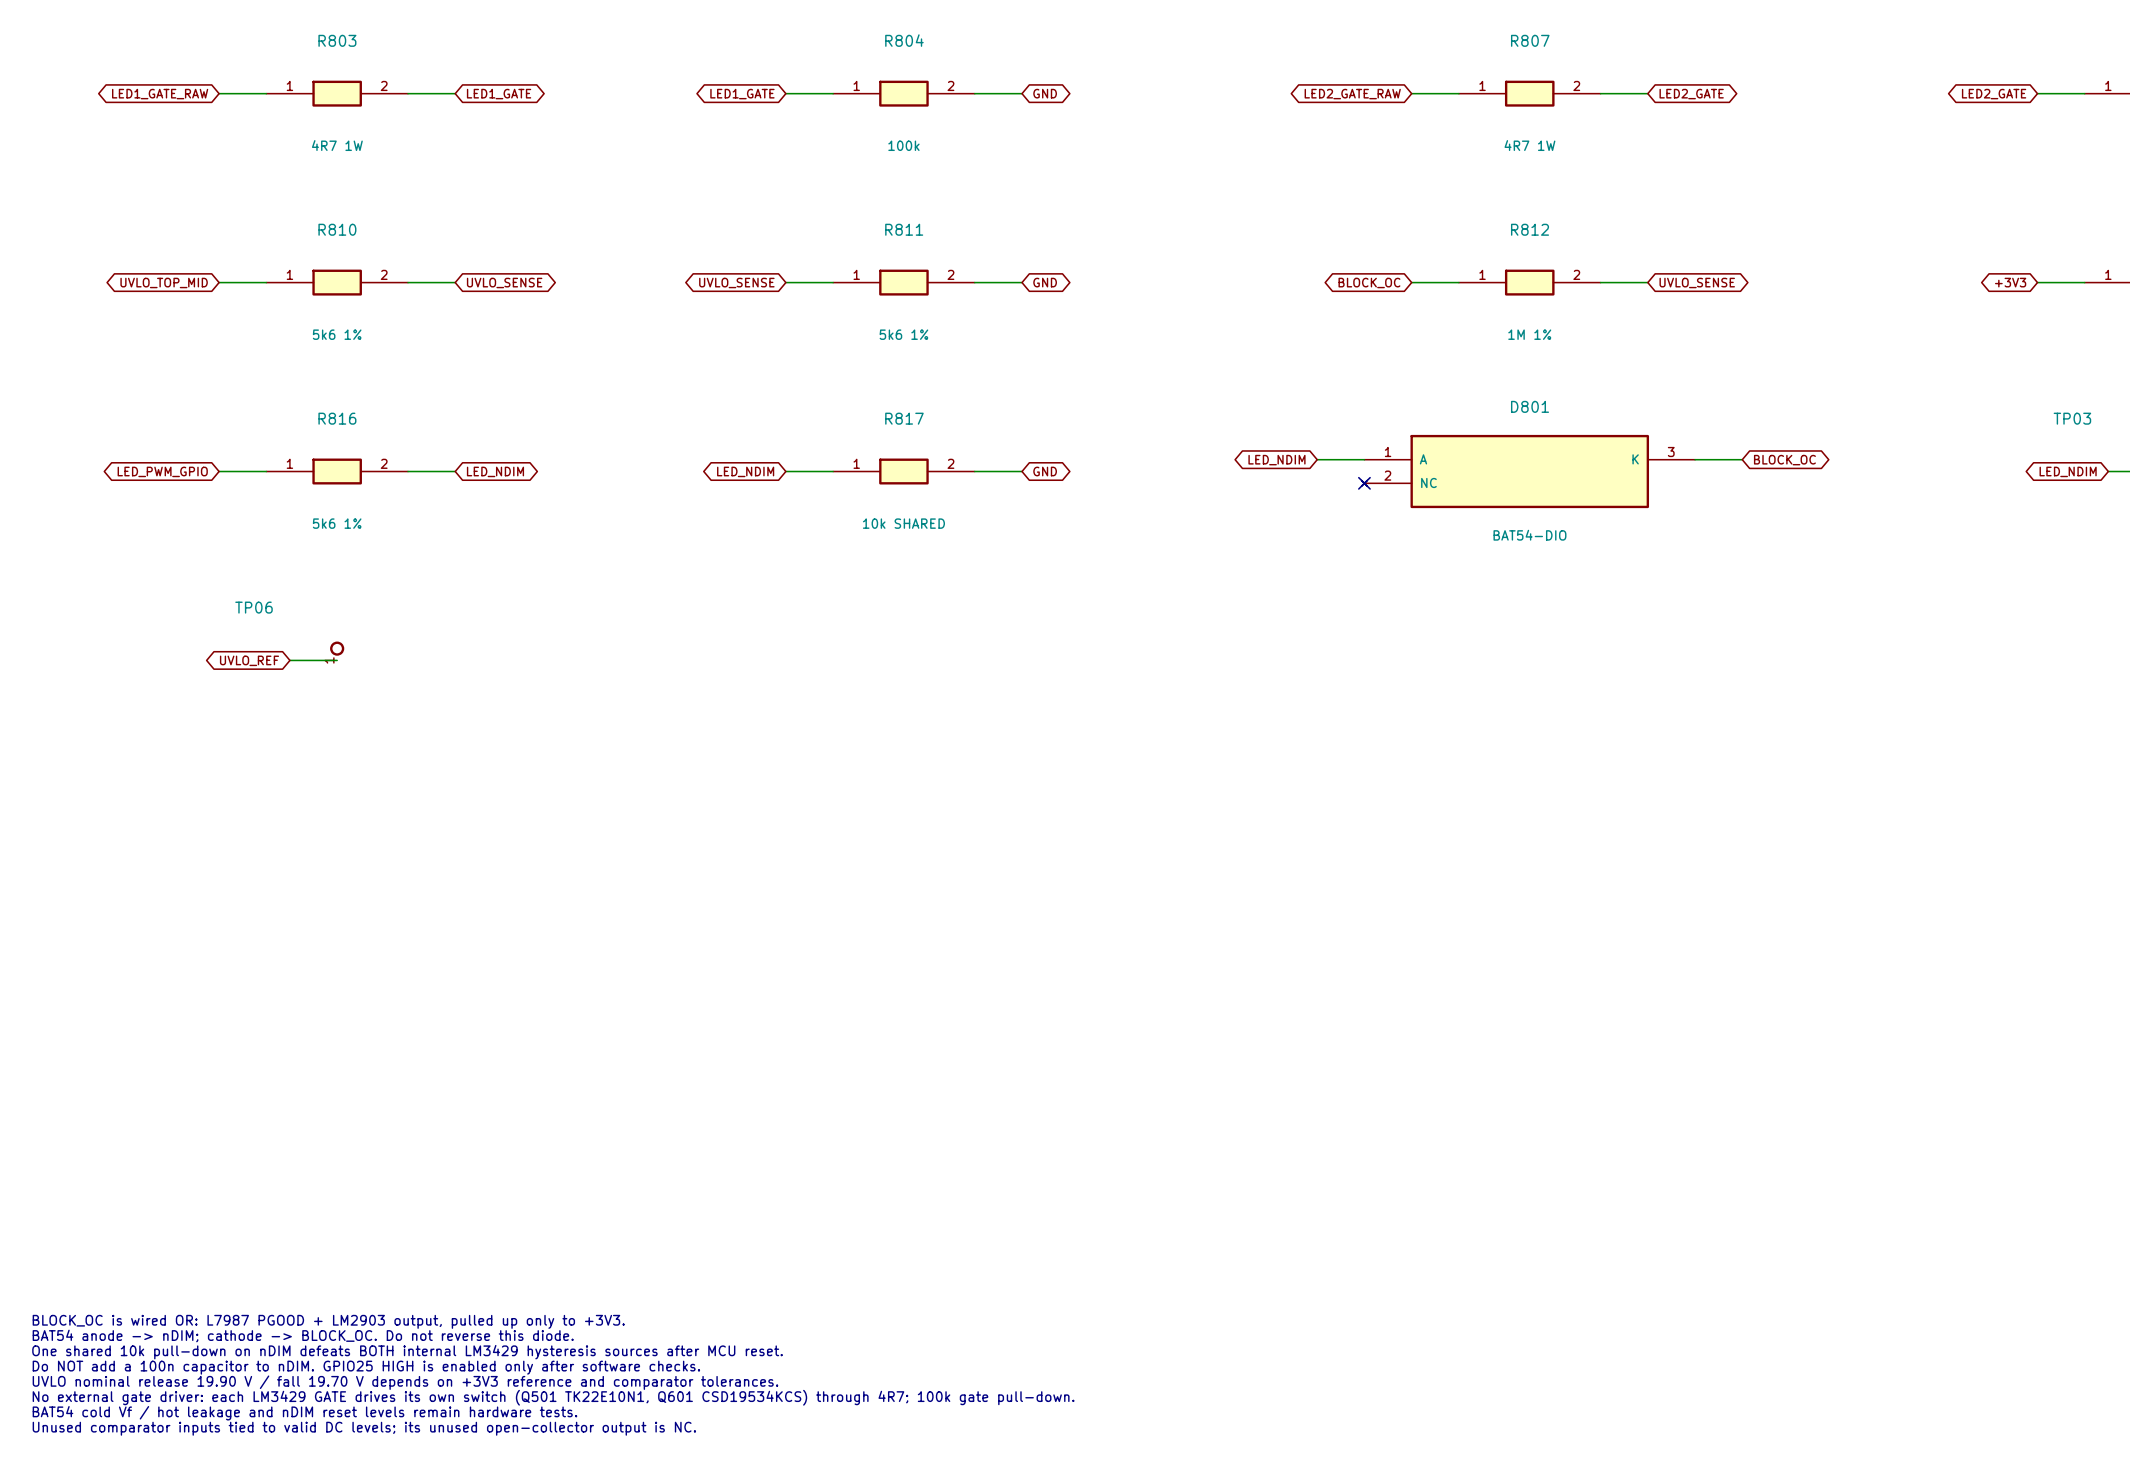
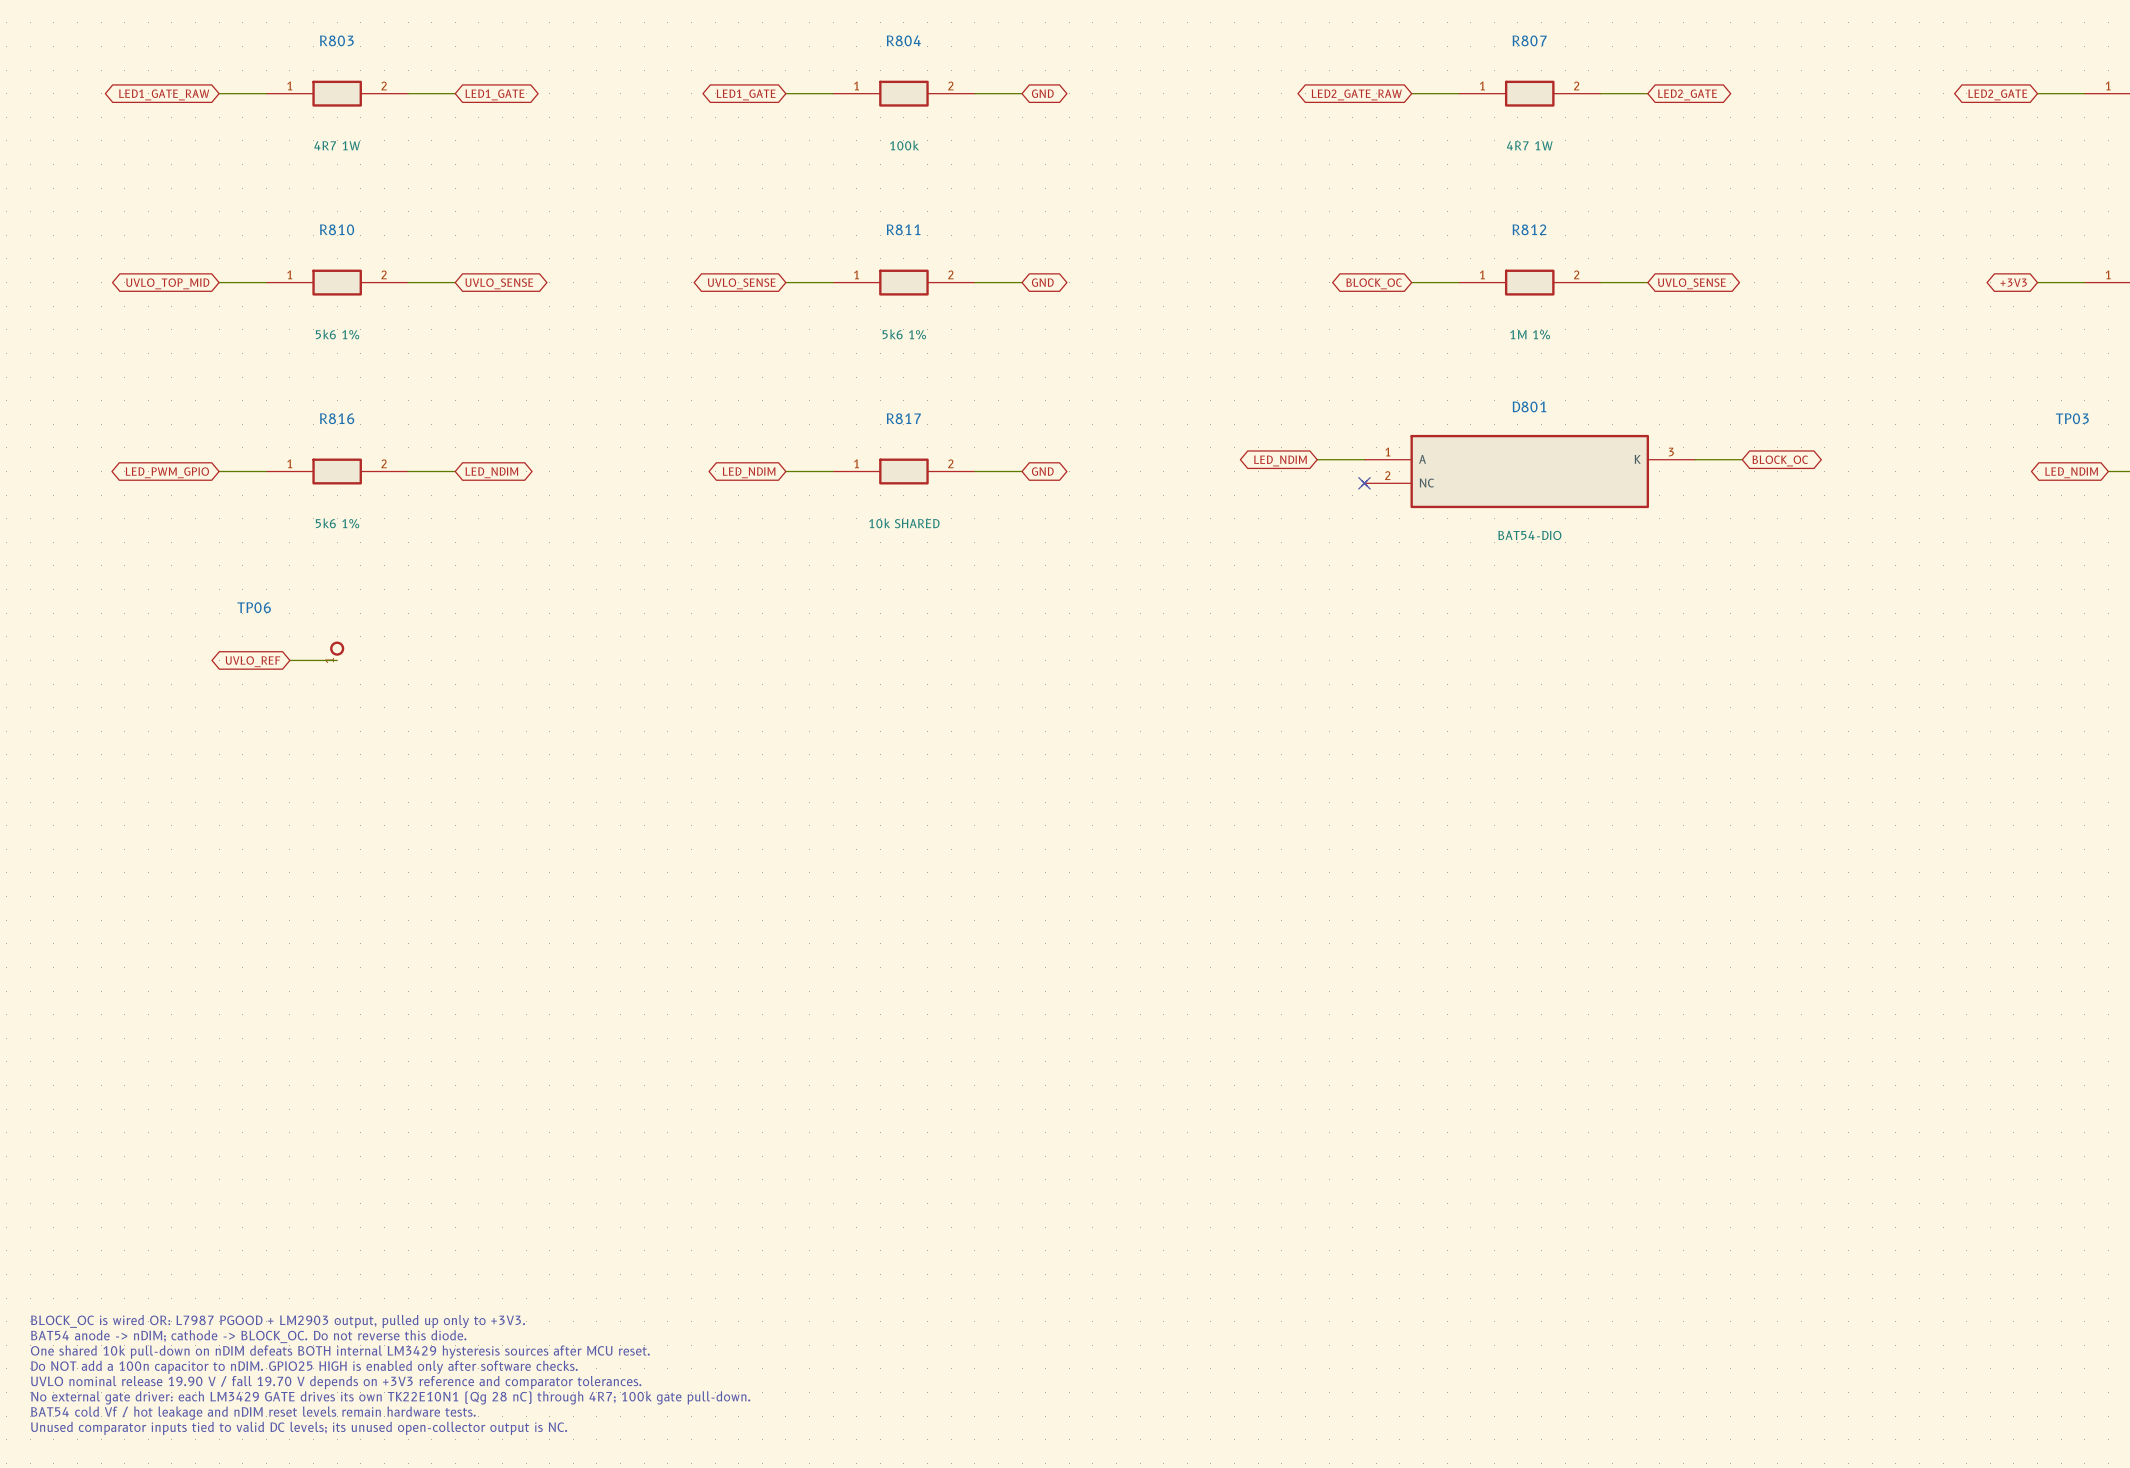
text: No external gate driver: each LM3429 GATE drives its own switch (Q501 TK22E10N1, Q601 CSD19534KCS) through 4R7; 100k gate pull-down. (553, 1397) -> No external gate driver: each LM3429 GATE drives its own TK22E10N1 (Qg 28 nC) through 4R7; 100k gate pull-down. (390, 1397)

